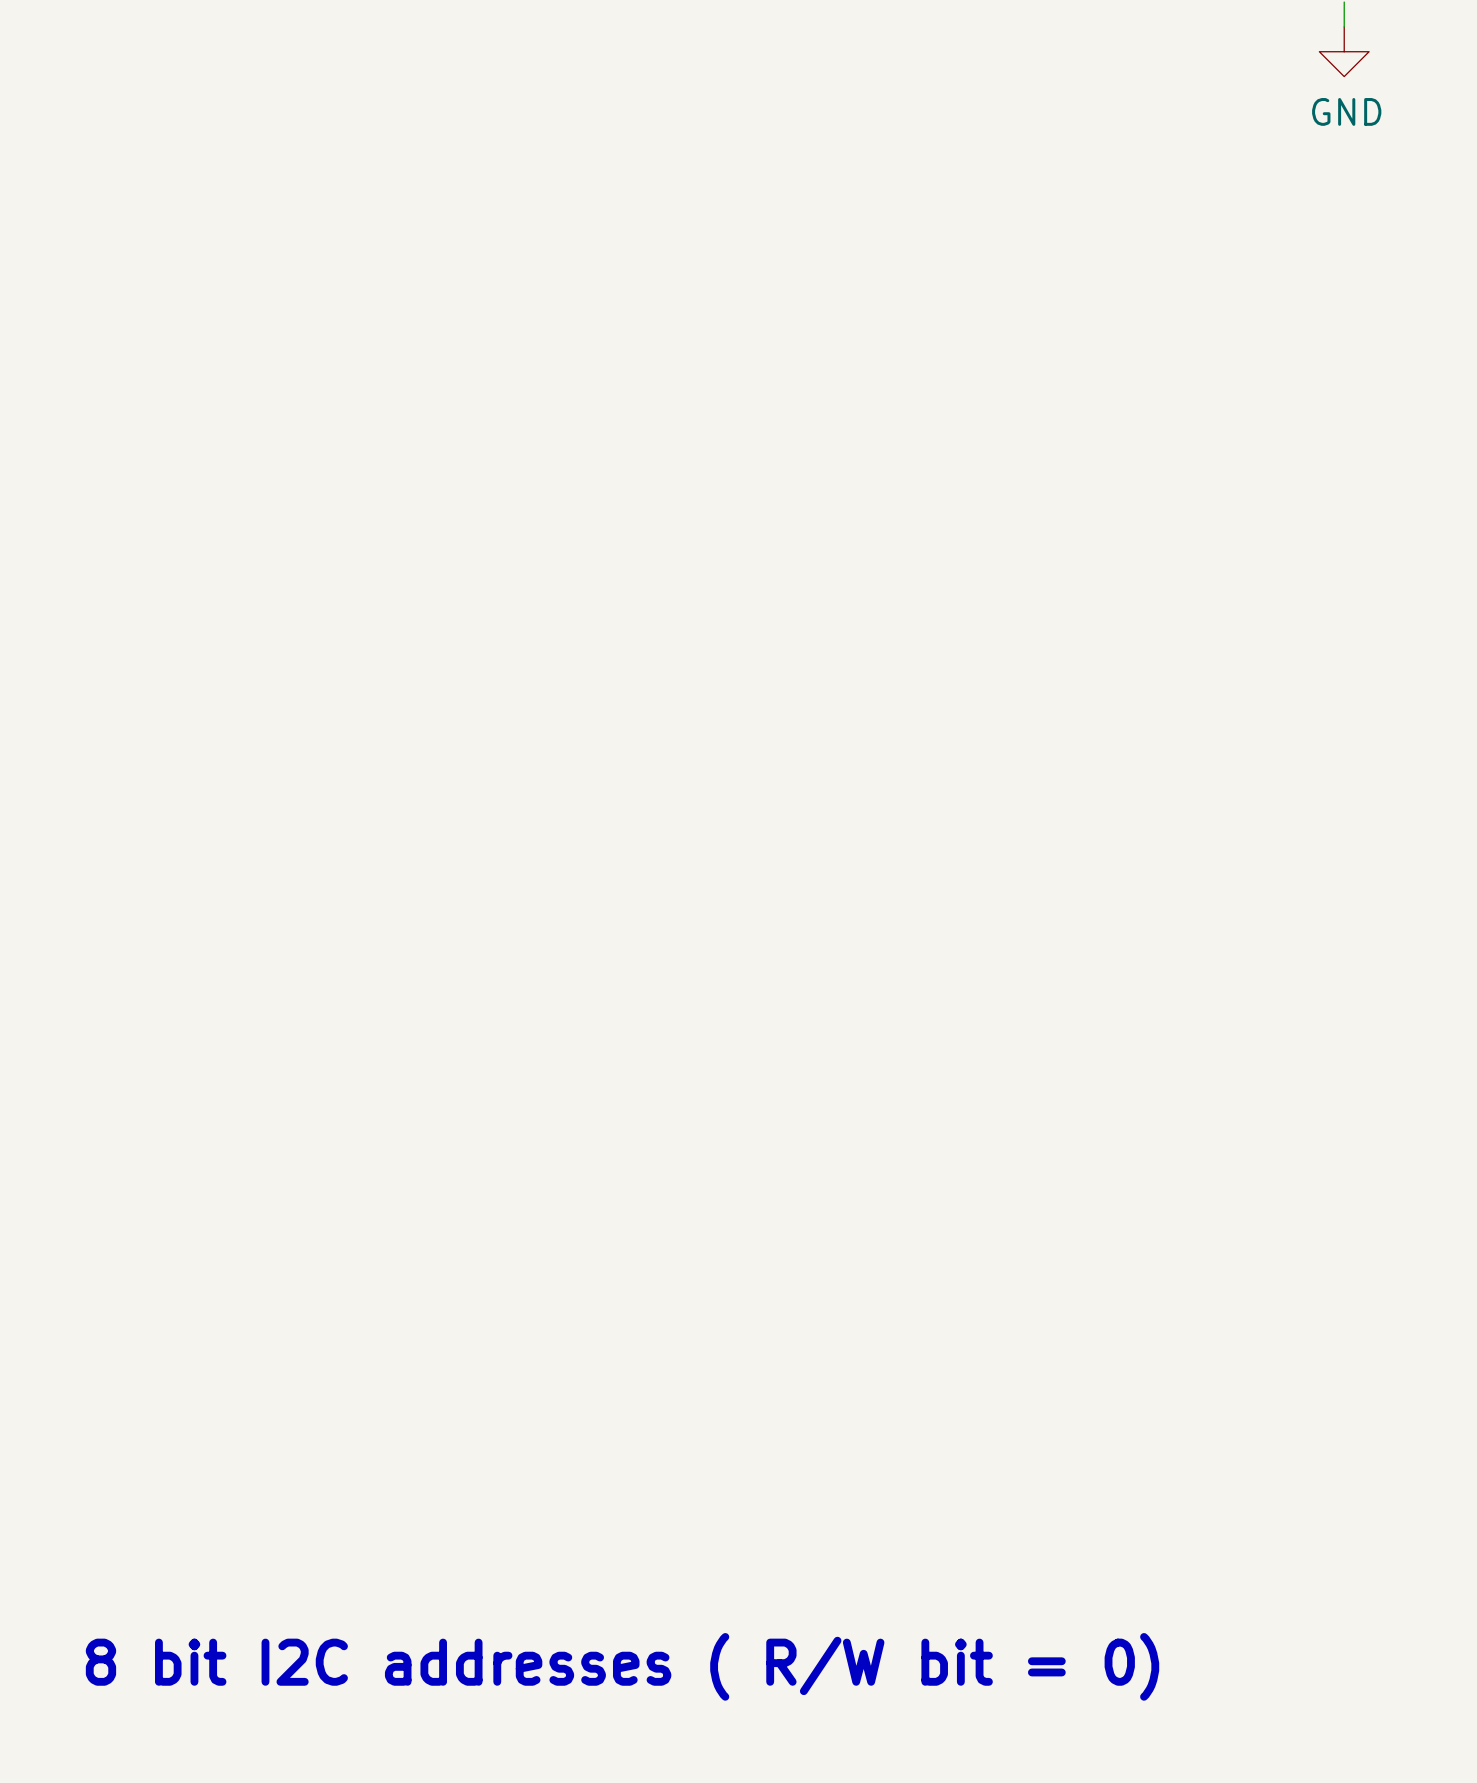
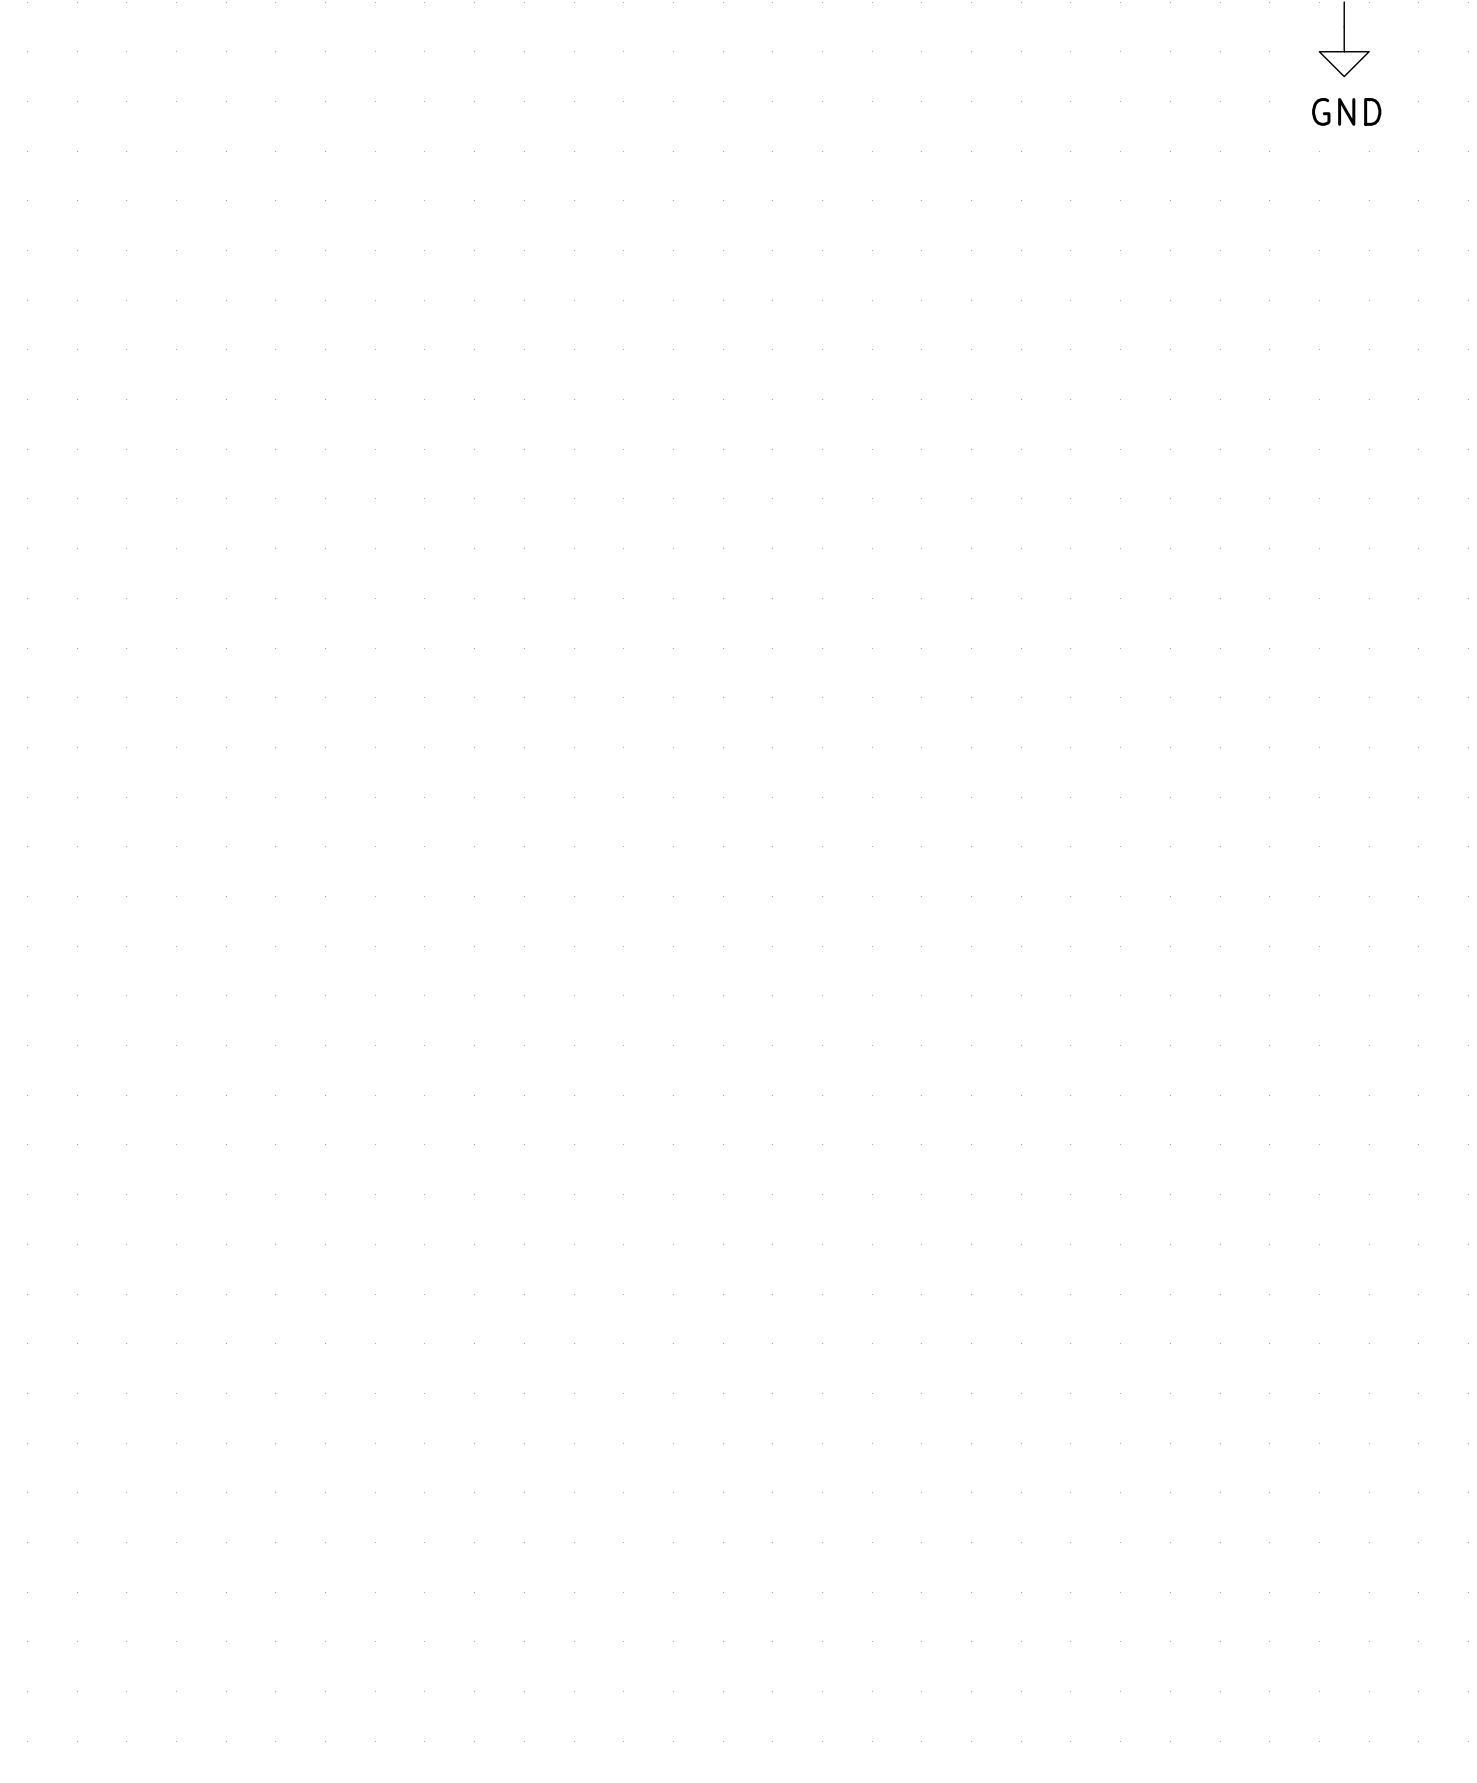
text: 8 bit I2C addresses ( R/W bit = 0) (622, 1666) -> none

